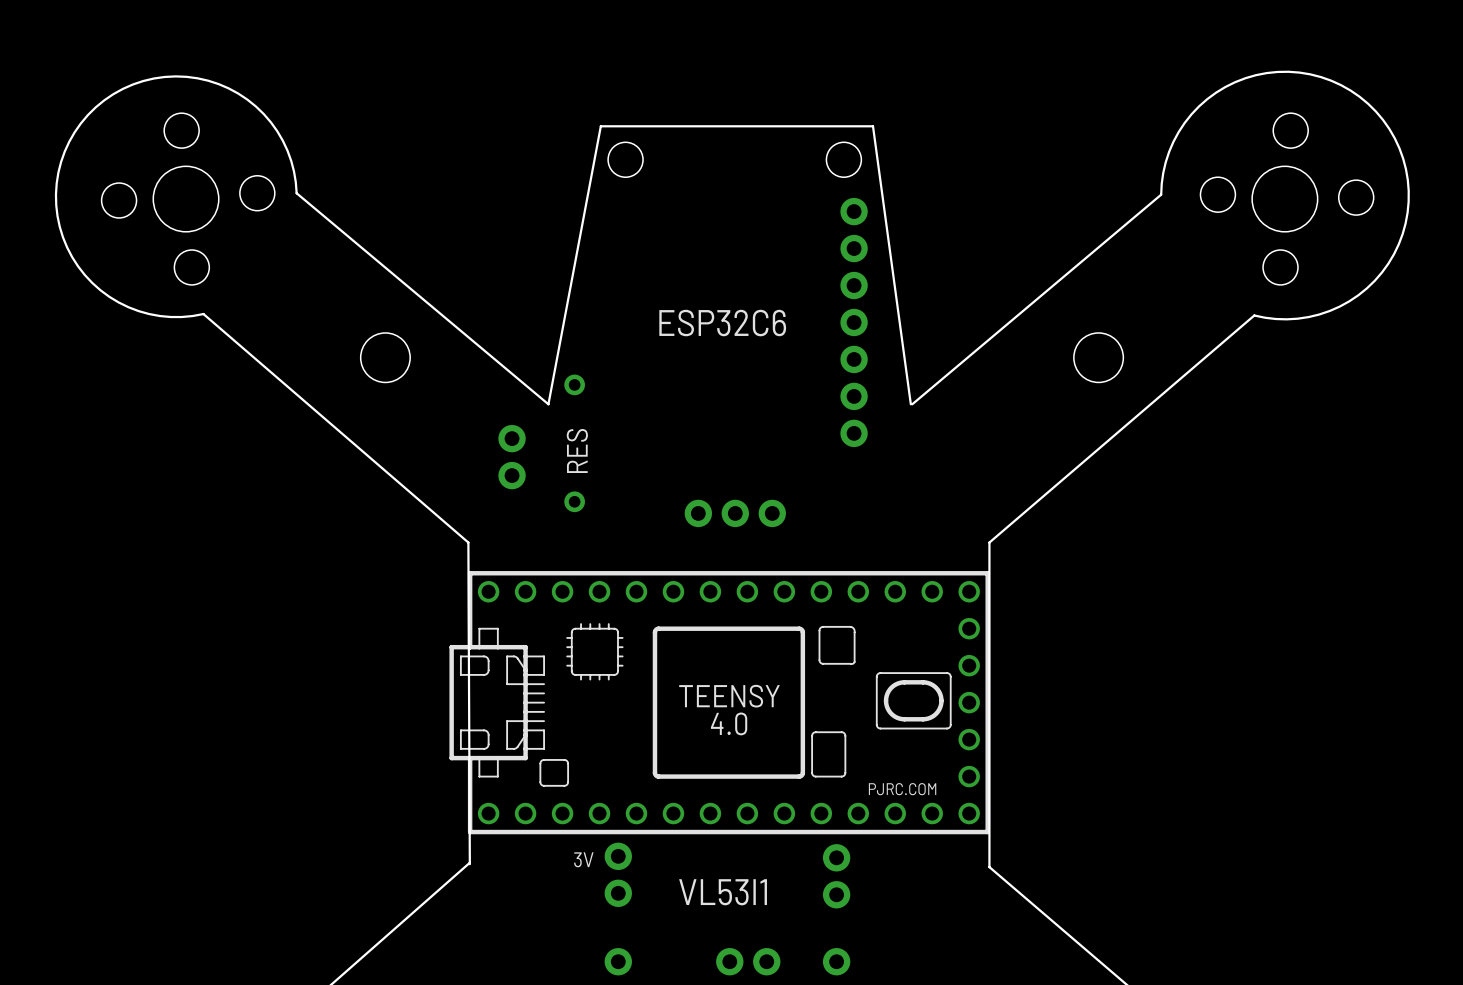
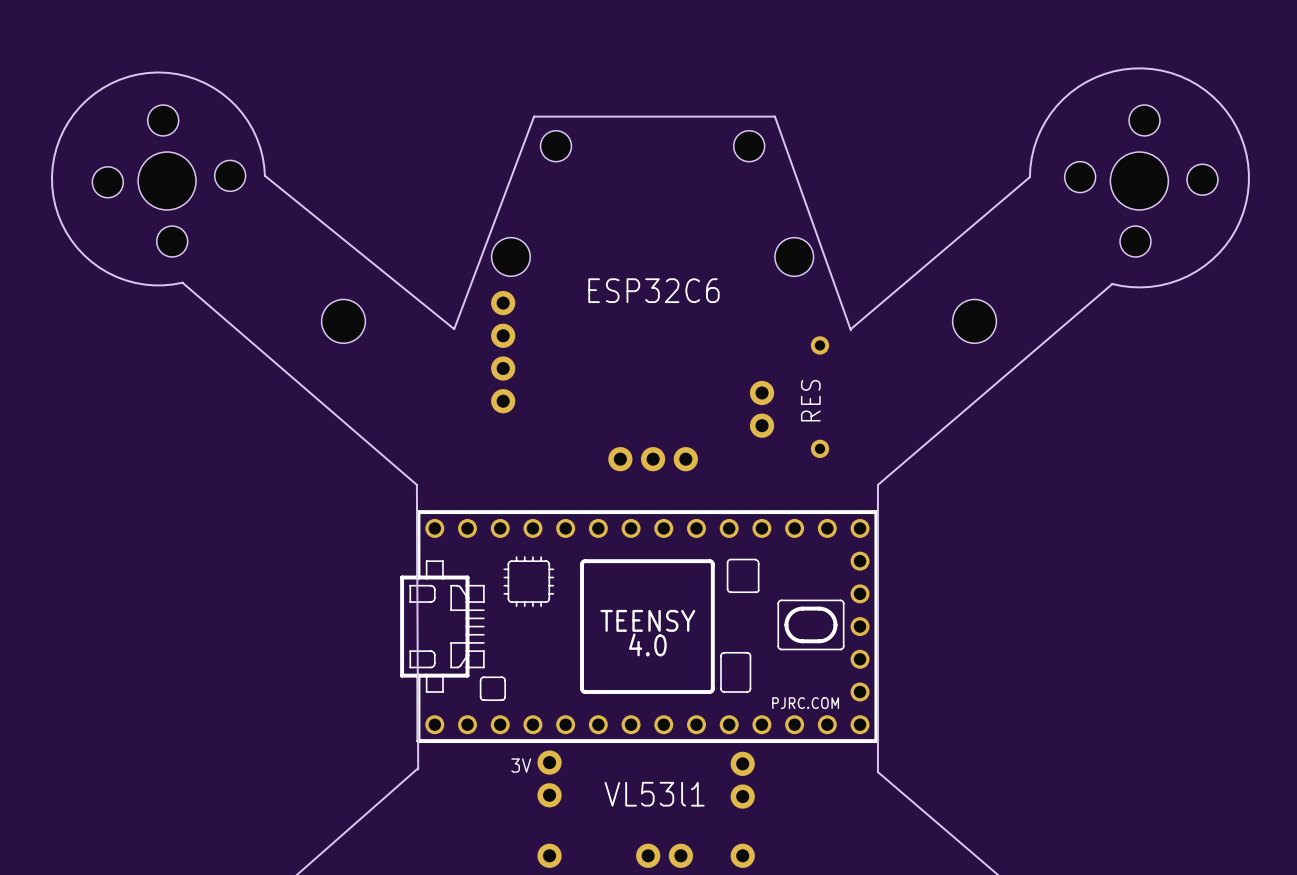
board edge: (600, 126) (548, 404) (296, 193) -> (534, 116) (454, 329) (264, 175)
board edge: (873, 126) (910, 404) -> (774, 116) (850, 330)
board edge: (1161, 194) (912, 404) -> (1029, 177) (850, 329)
hole: none -> (510, 256)
hole: none -> (794, 256)
part: (854, 322) -> none
part footprint: [564, 374, 585, 396] -> [491, 290, 516, 414]
part: none -> (819, 345)
text position: RES (577, 450) -> RES (810, 400)
part position: (512, 457) -> (762, 409)
part: (574, 501) -> none
part: none -> (819, 448)

